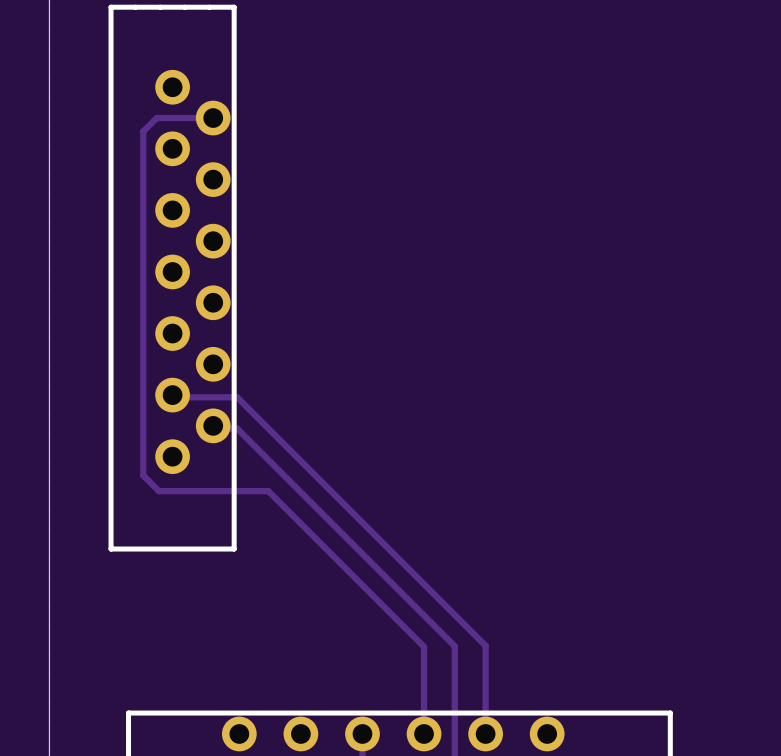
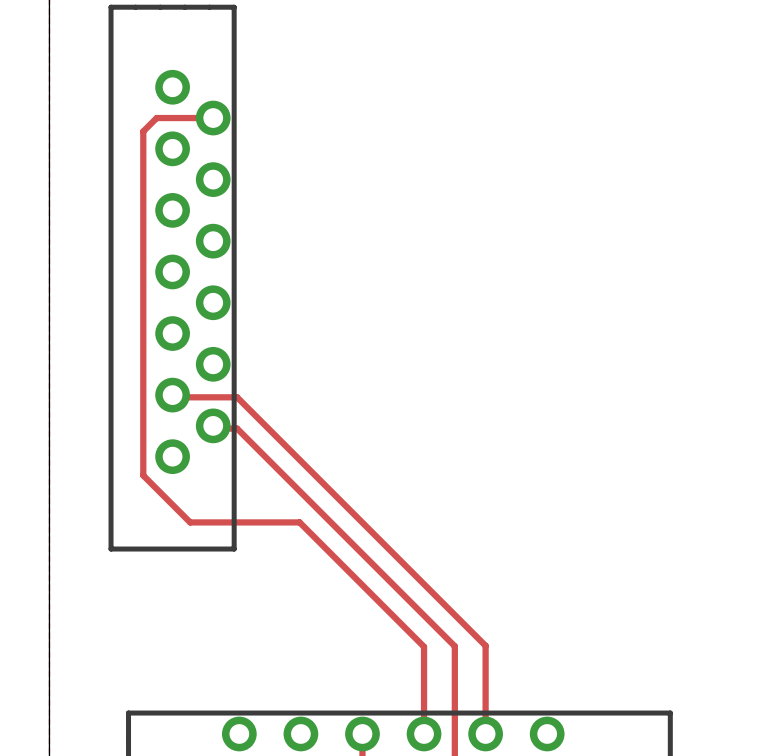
track: (158, 491) (268, 491) (299, 522) -> (158, 491) (190, 522) (299, 522)

